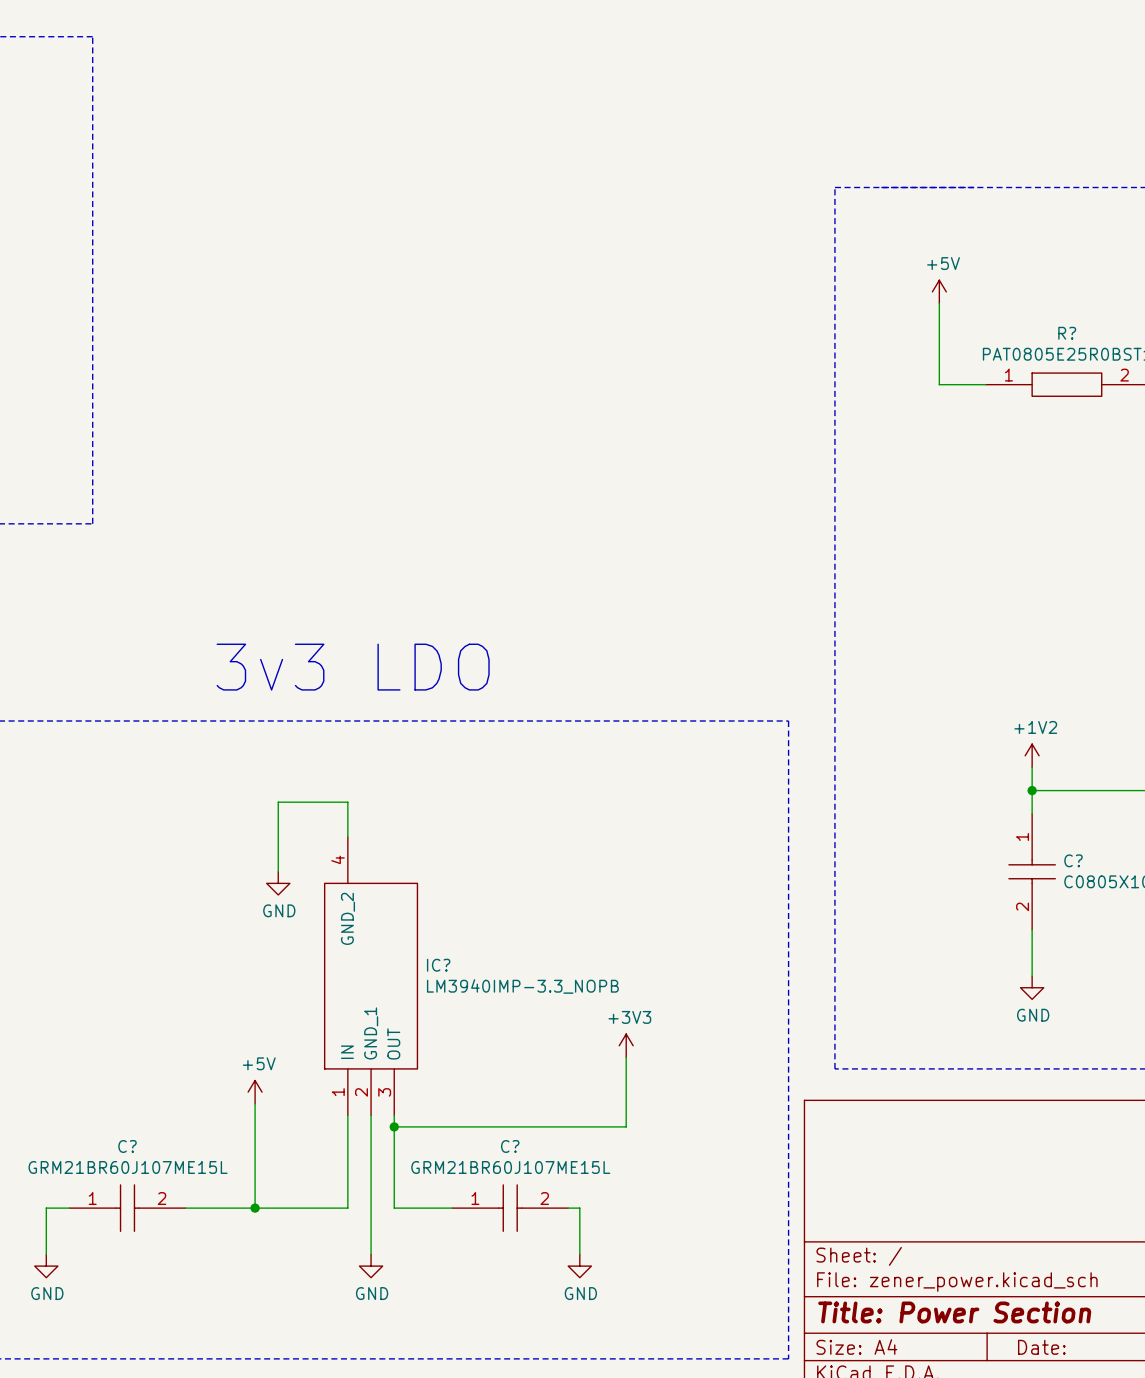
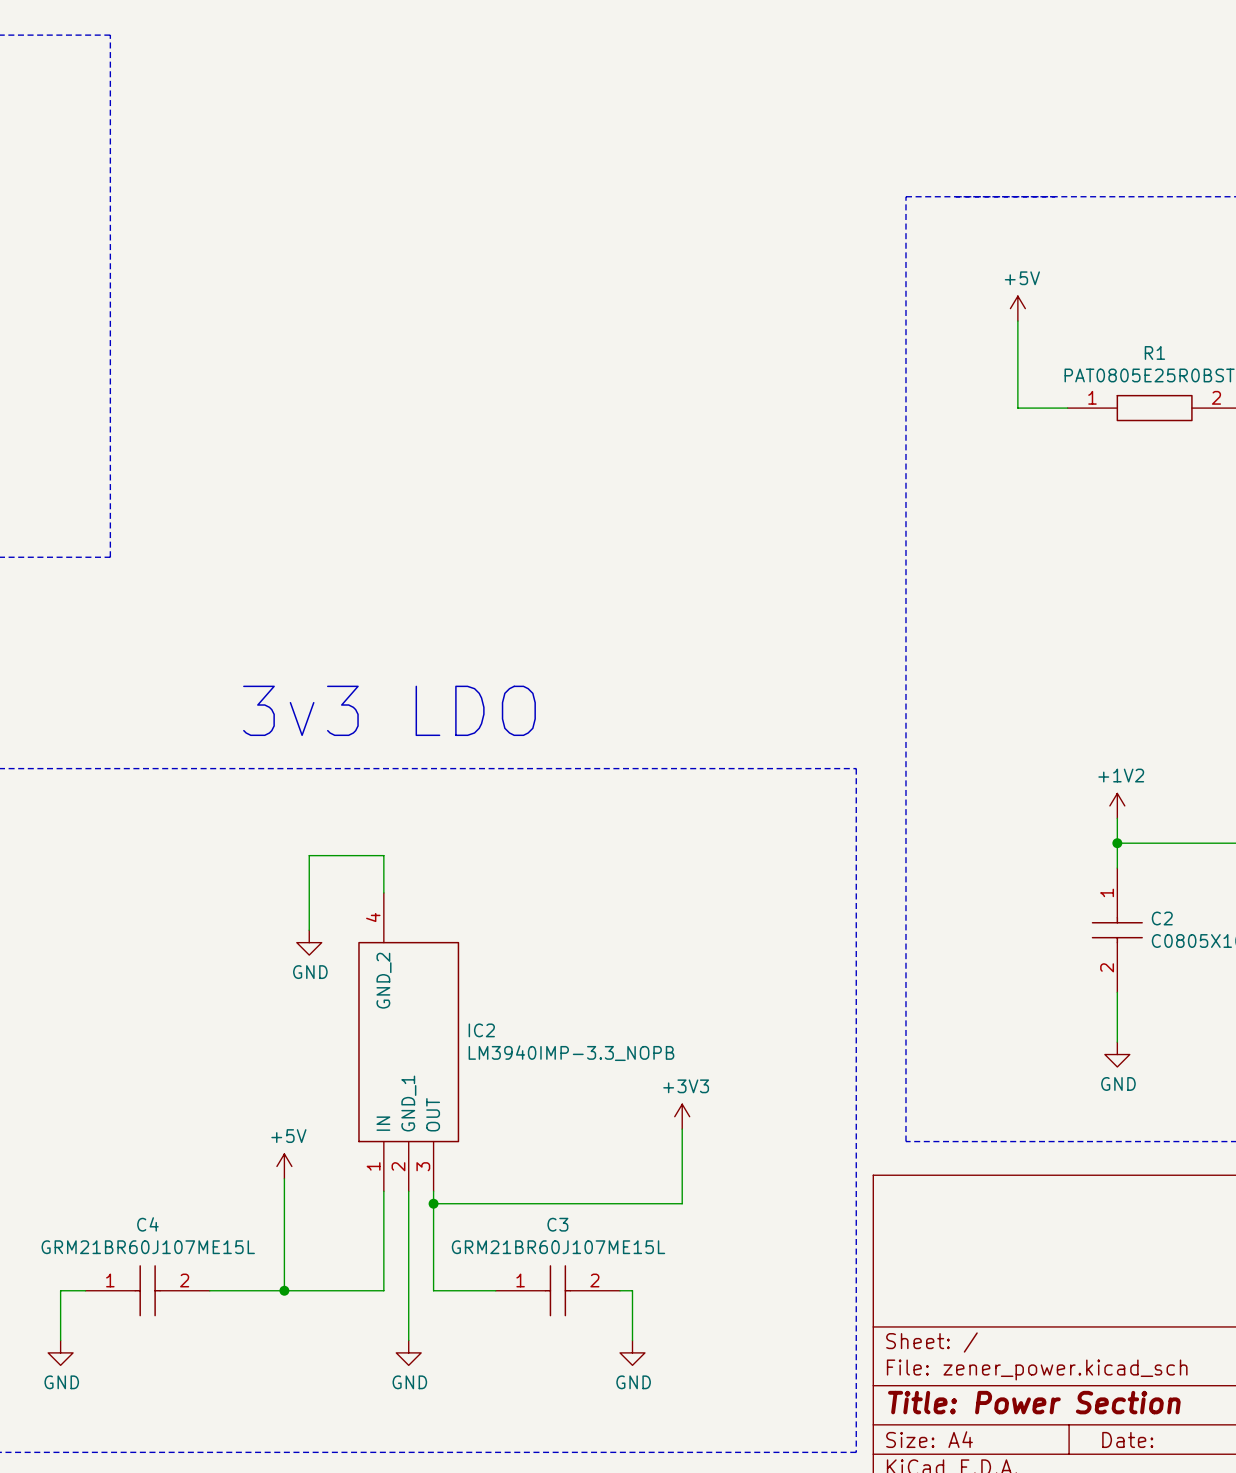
R? name: R? (1067, 333) -> R1 (1154, 352)
C? name: C? (1073, 860) -> C2 (1162, 918)
IC? name: IC? (438, 965) -> IC2 (481, 1030)
C? name: C? (127, 1146) -> C4 (147, 1224)
C? name: C? (510, 1146) -> C3 (557, 1224)

